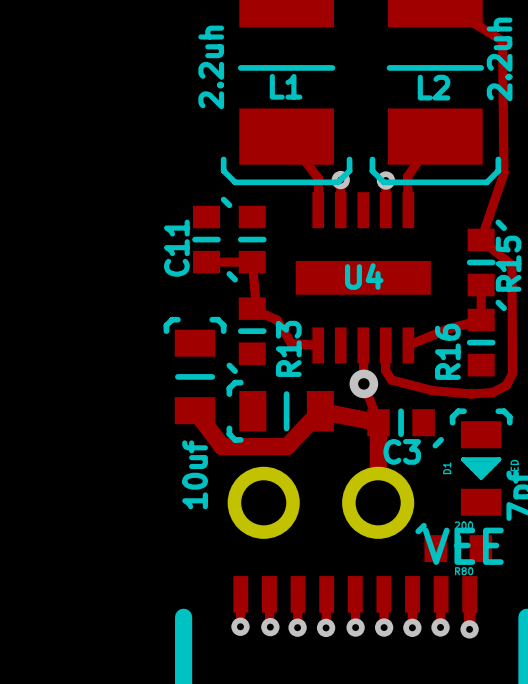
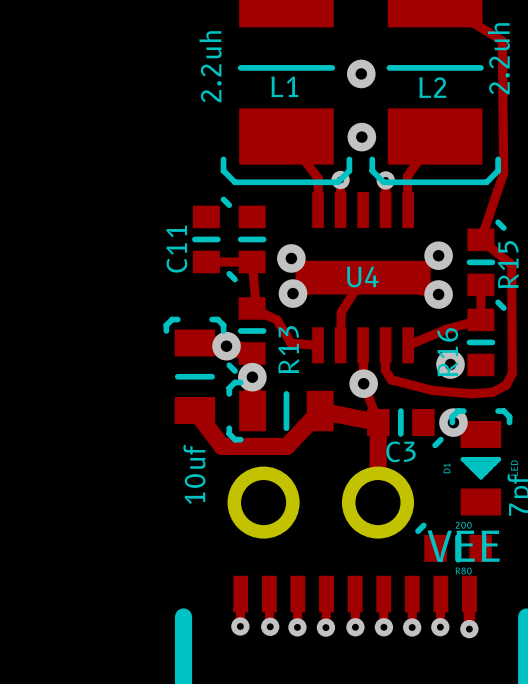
via: none -> (361, 73)
via: none -> (361, 137)
via: none -> (438, 255)
via: none -> (291, 258)
track: none -> (363, 277) (341, 312) (340, 345)
via: none -> (292, 293)
via: none -> (438, 294)
via: none -> (226, 346)
via: none -> (450, 364)
via: none -> (252, 377)
via: none -> (453, 422)

